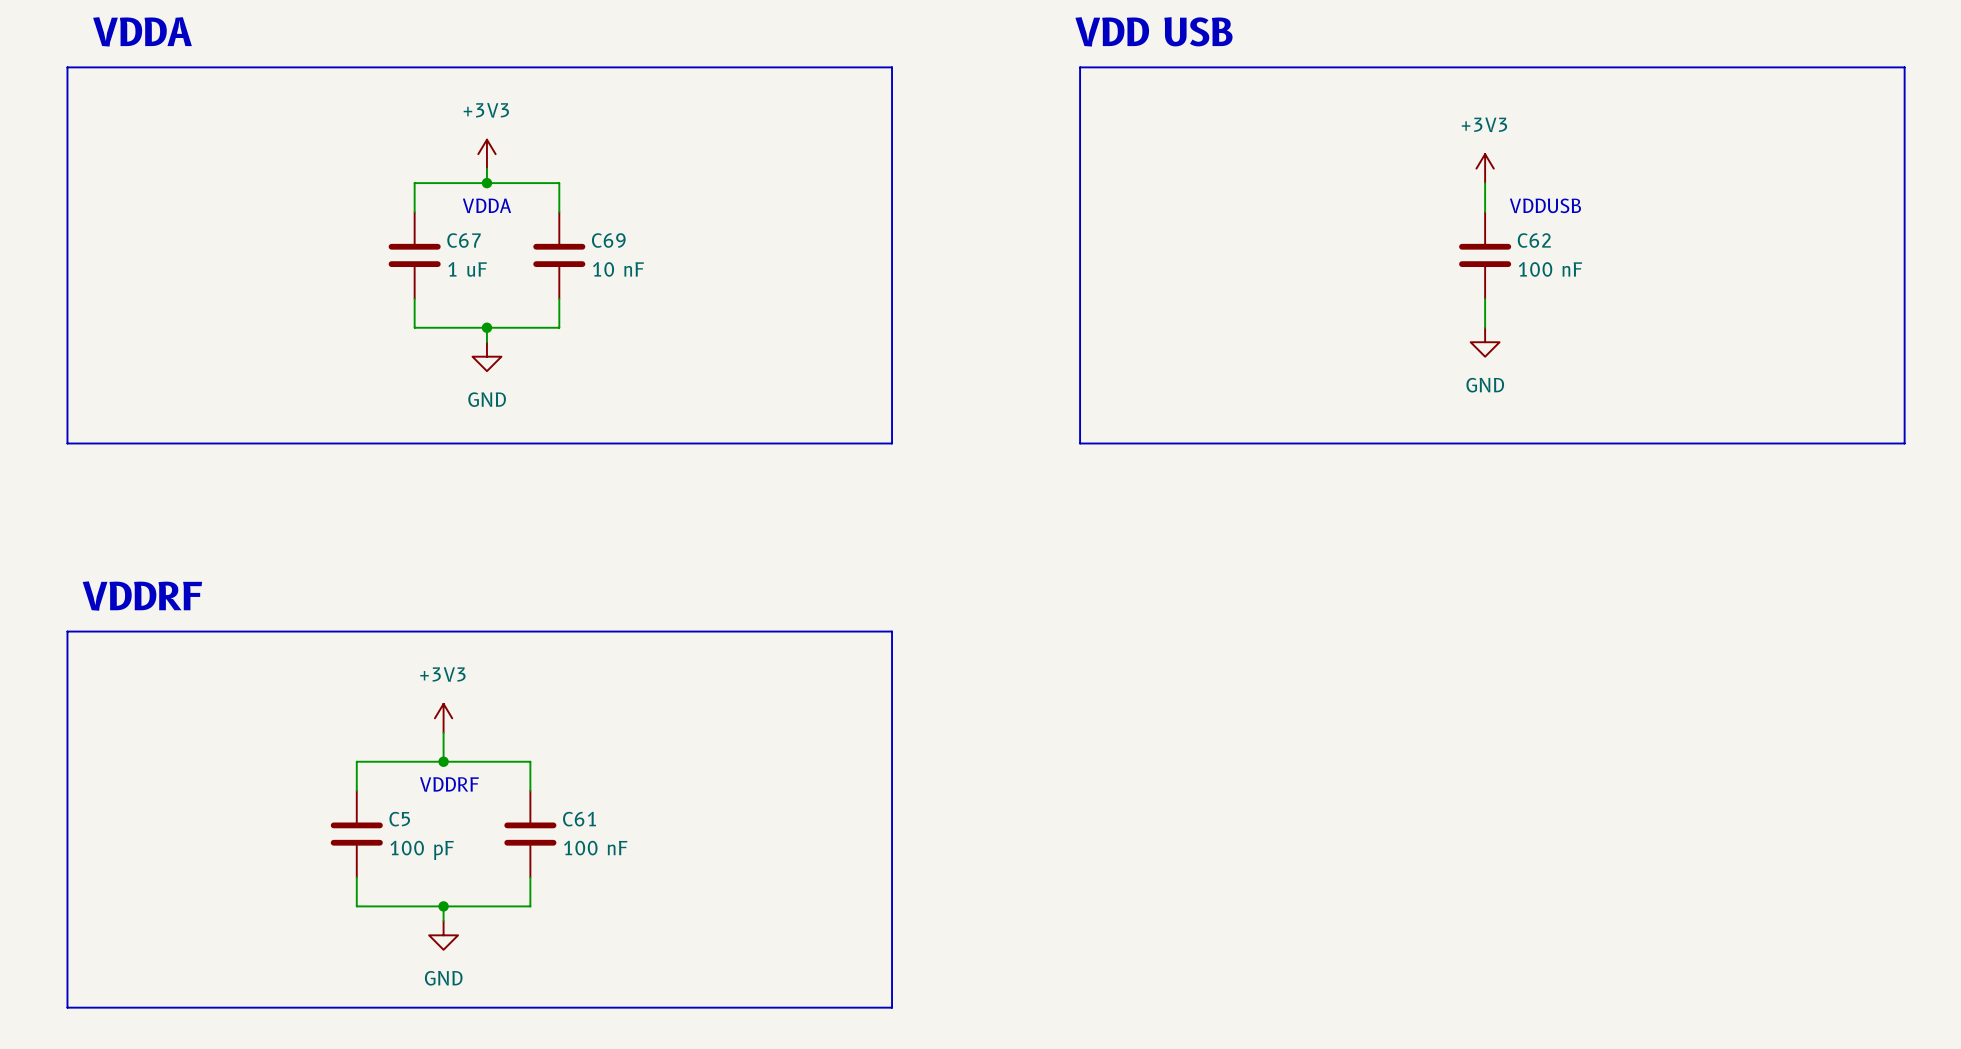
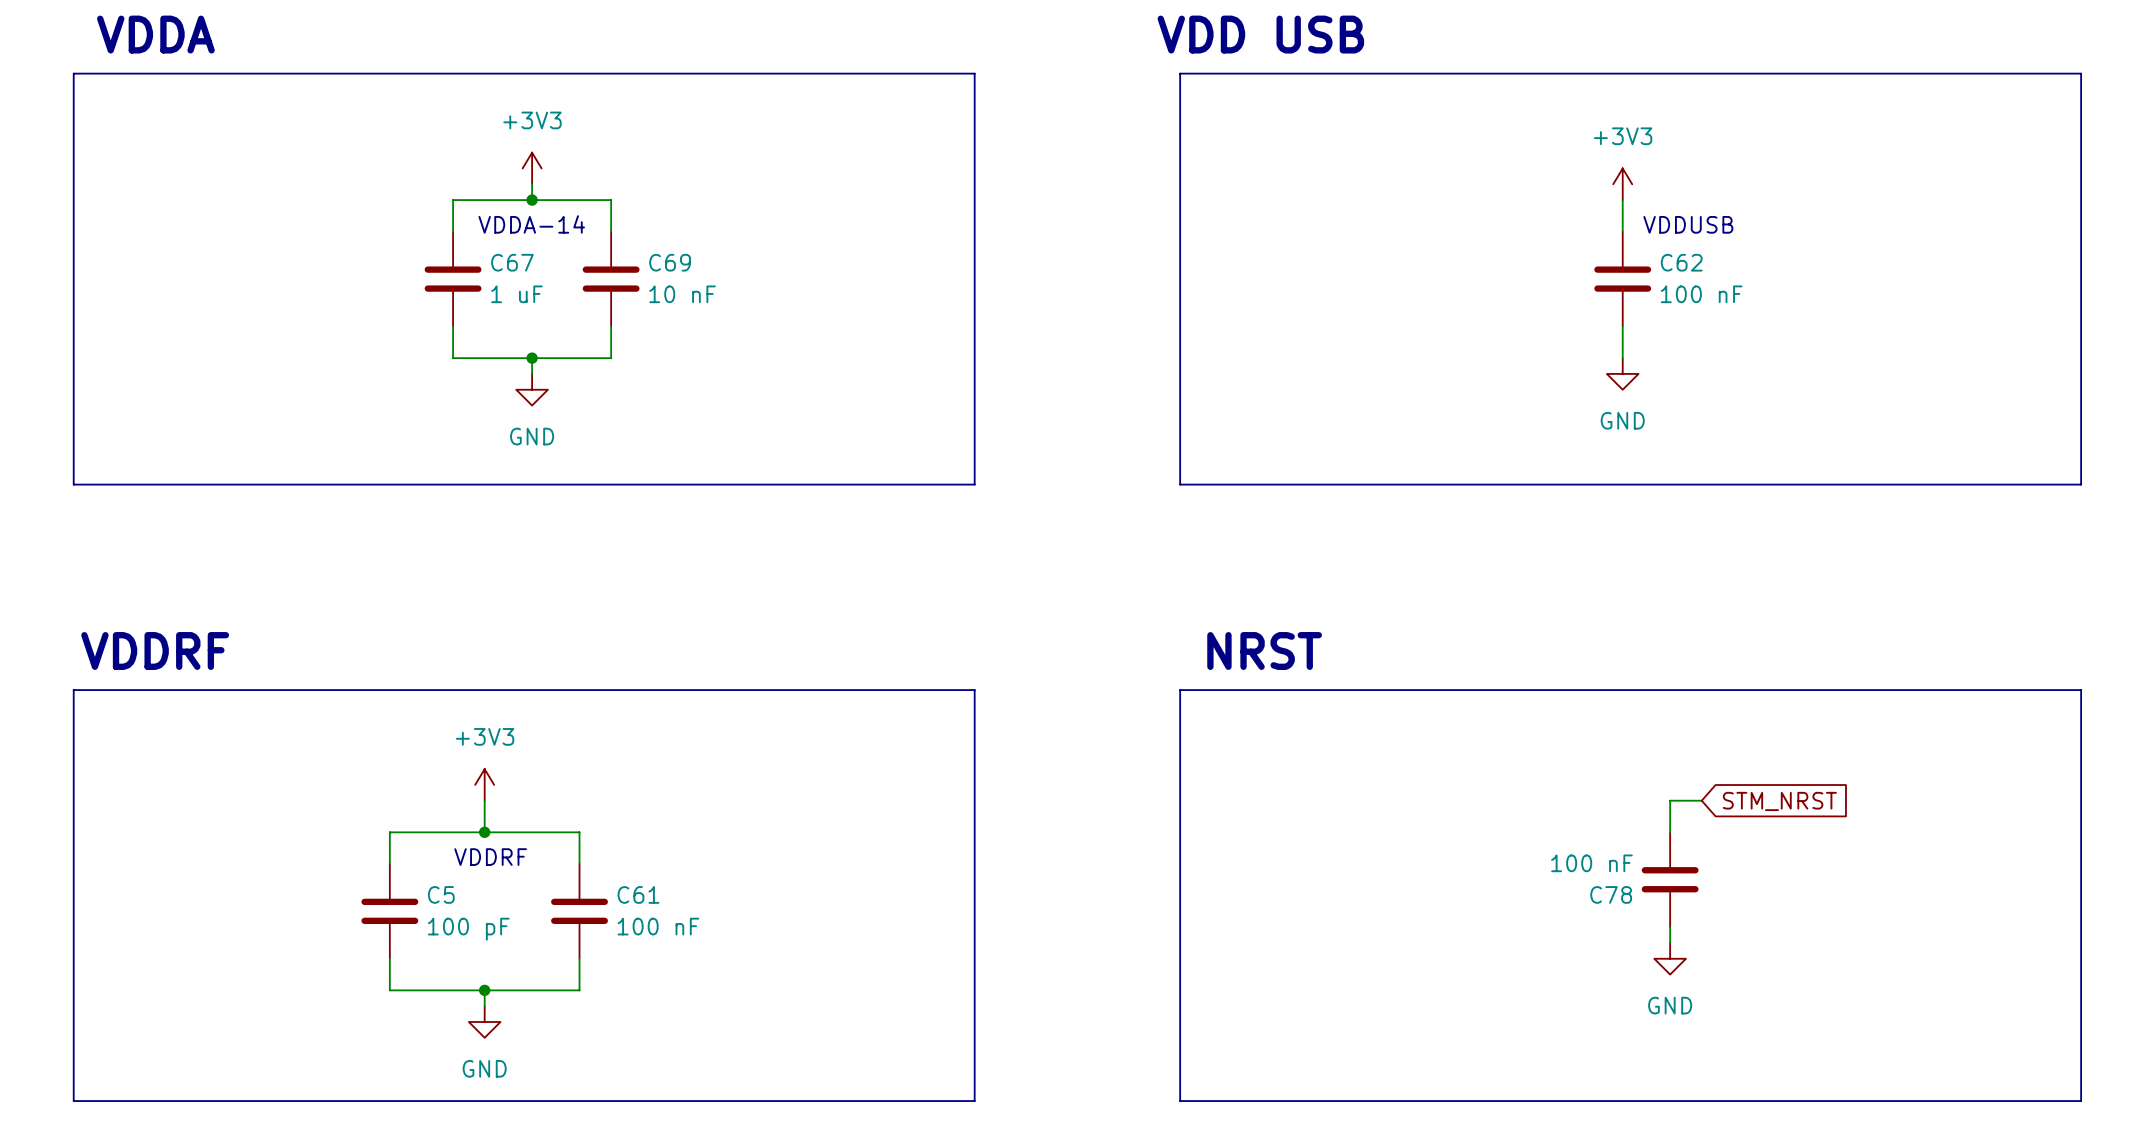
text: VDDA (486, 205) -> VDDA-14 (531, 224)
text: none -> NRST (1264, 651)
line: none -> (1180, 690) (2081, 690) (2081, 1101) (1180, 1101) (1180, 690)
wire: none -> (1701, 800) (1670, 800) (1670, 832)
global label: none -> STM_NRST (1779, 801)
C78: none -> 100 nF (1670, 879)
wire: none -> (1670, 927) (1670, 942)
power symbol: none -> GND (1670, 958)

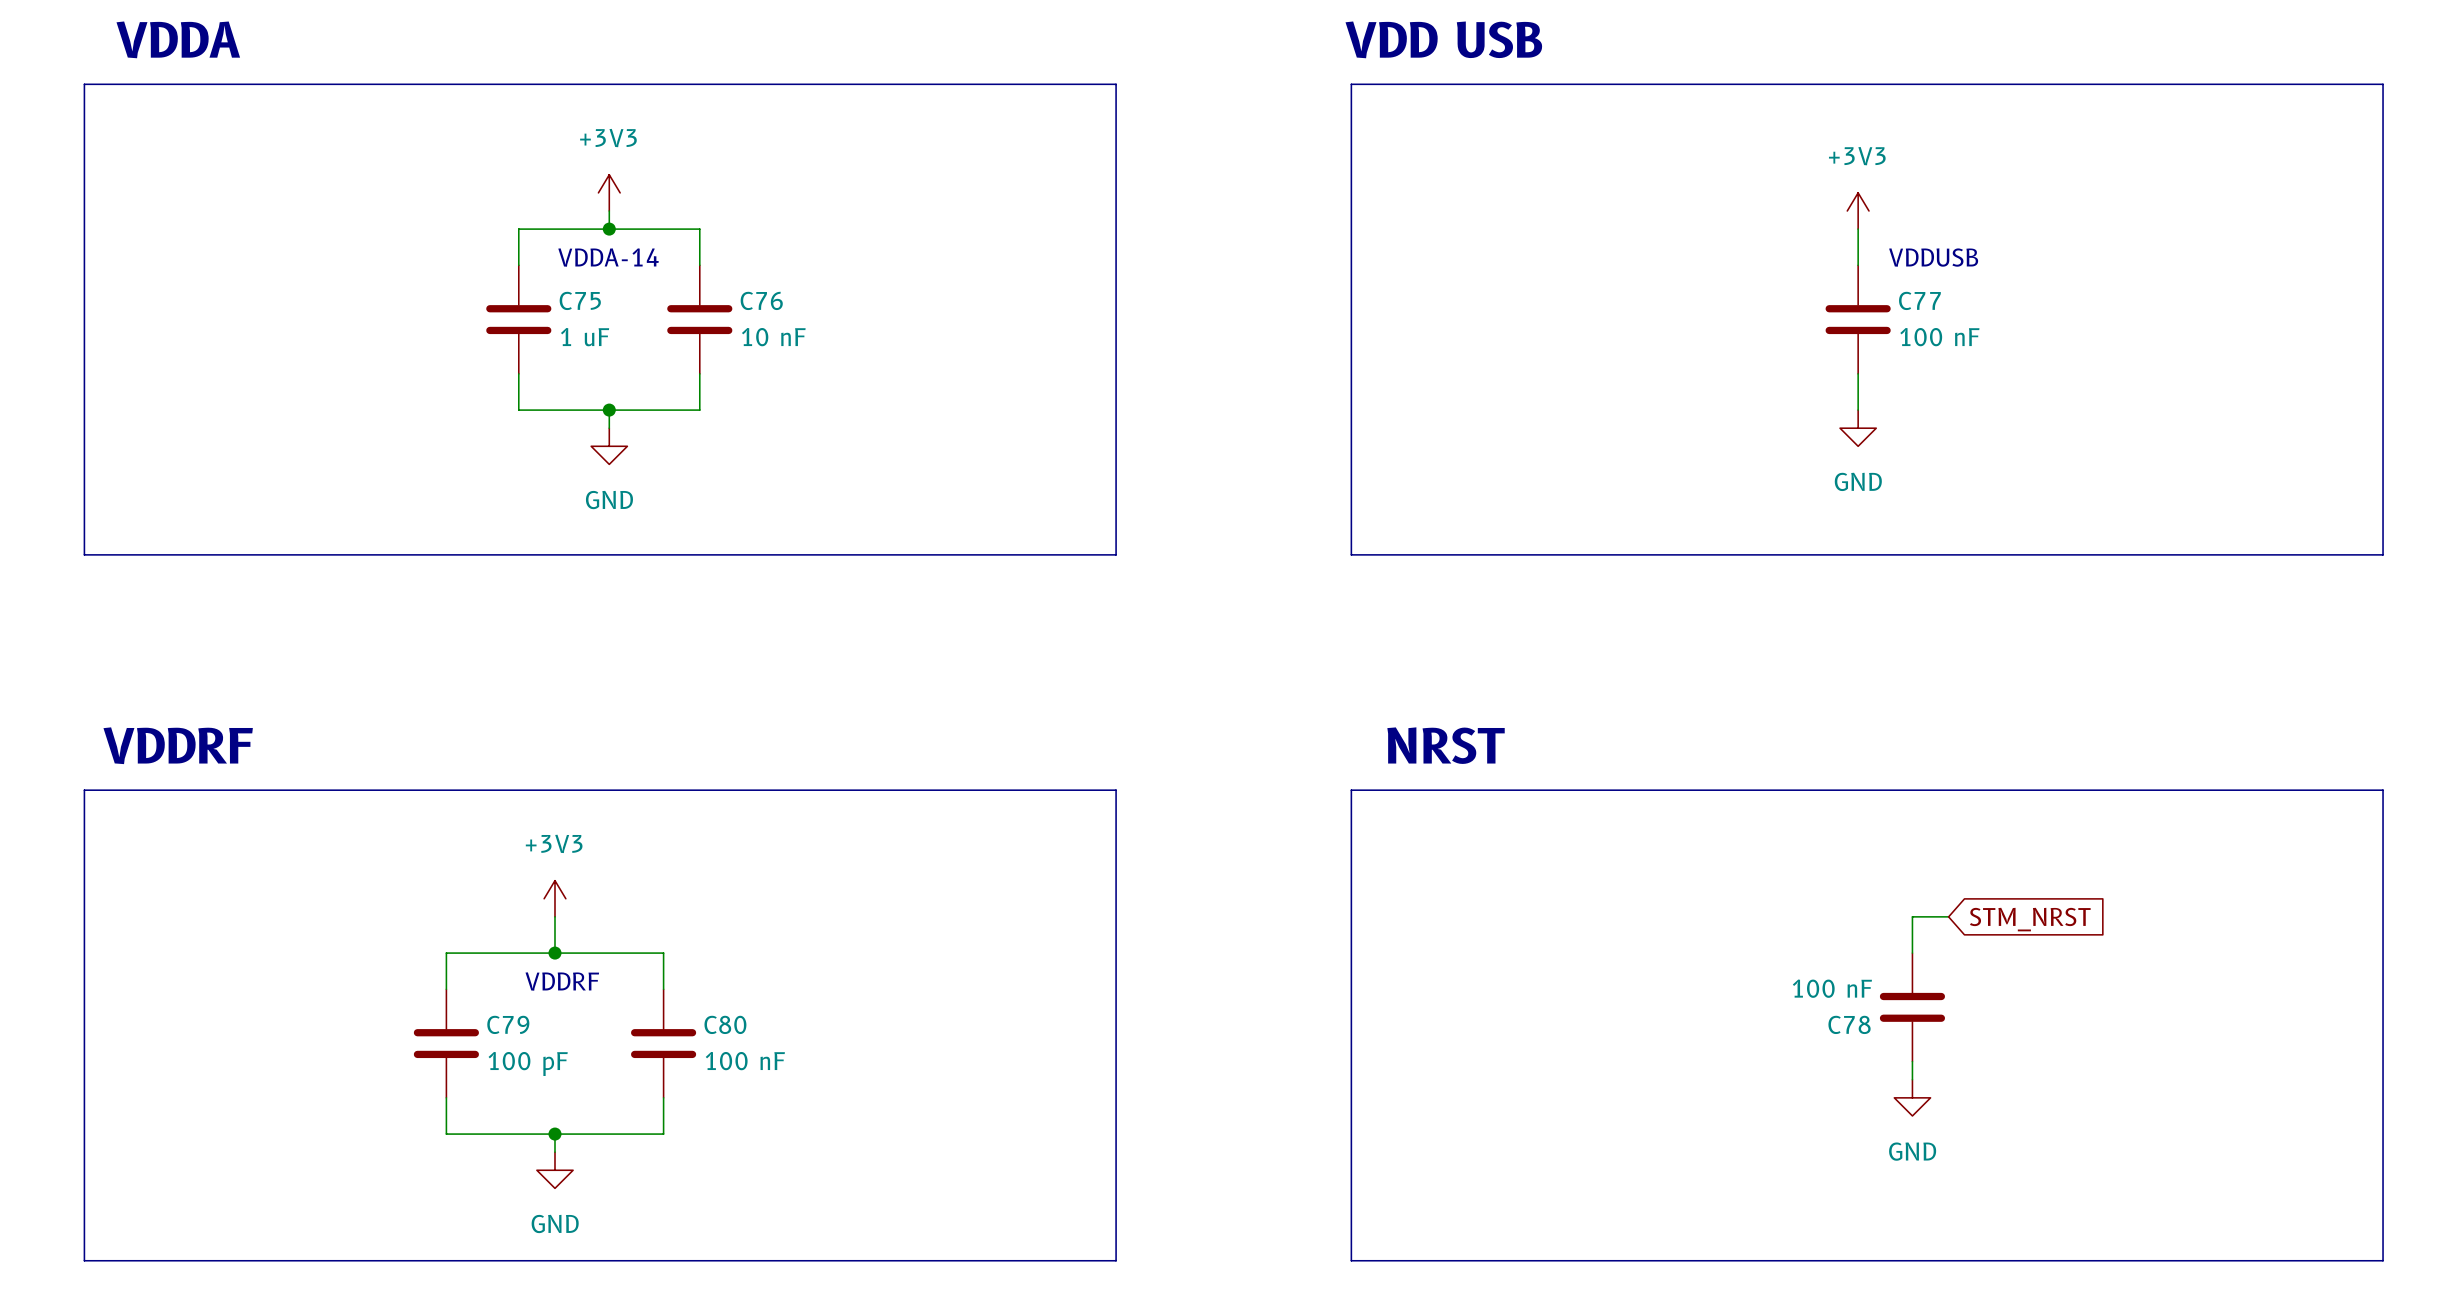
C67 name: C67 (512, 262) -> C75 (580, 300)
C69 name: C69 (670, 262) -> C76 (761, 300)
C62 name: C62 (1681, 262) -> C77 (1919, 300)
C5 name: C5 (441, 894) -> C79 (508, 1024)
C61 name: C61 (638, 894) -> C80 (725, 1024)

